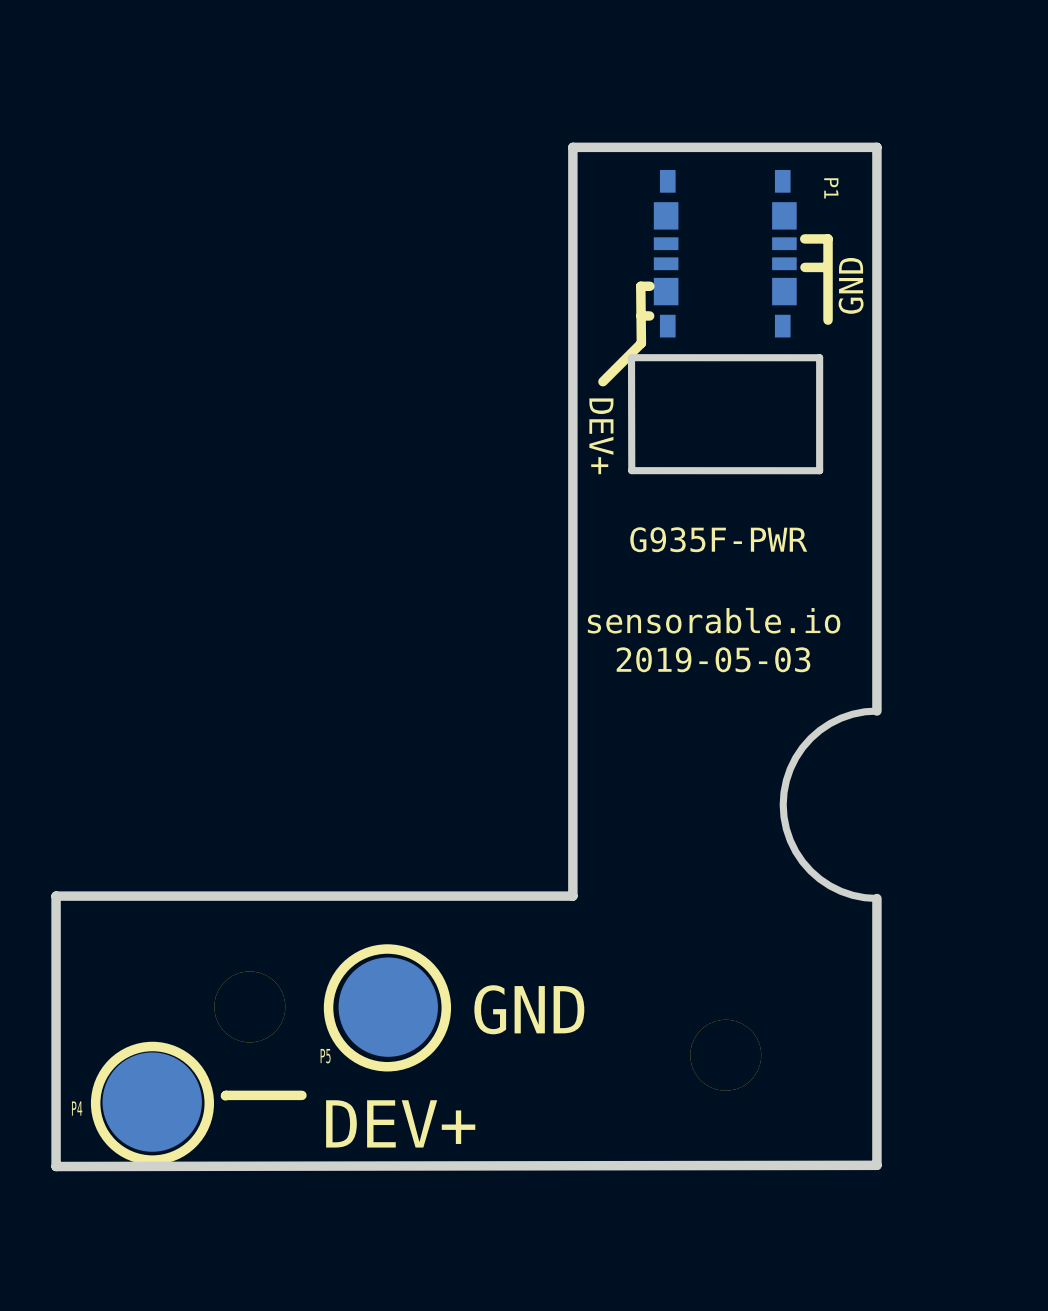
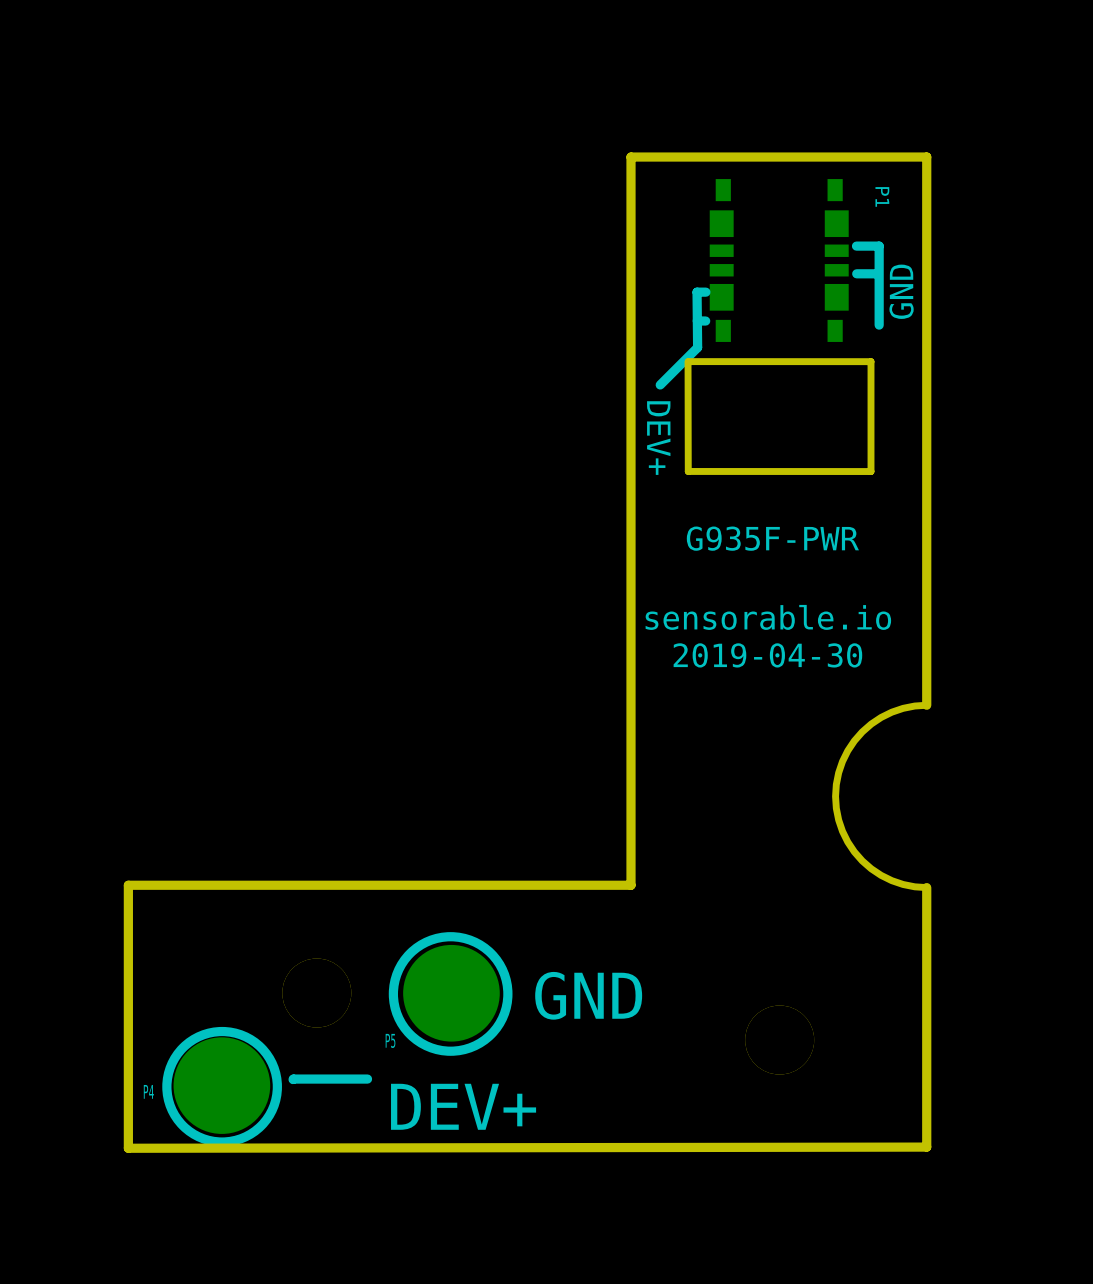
text: 2019-05-03 (713, 659) -> 2019-04-30 (767, 655)

